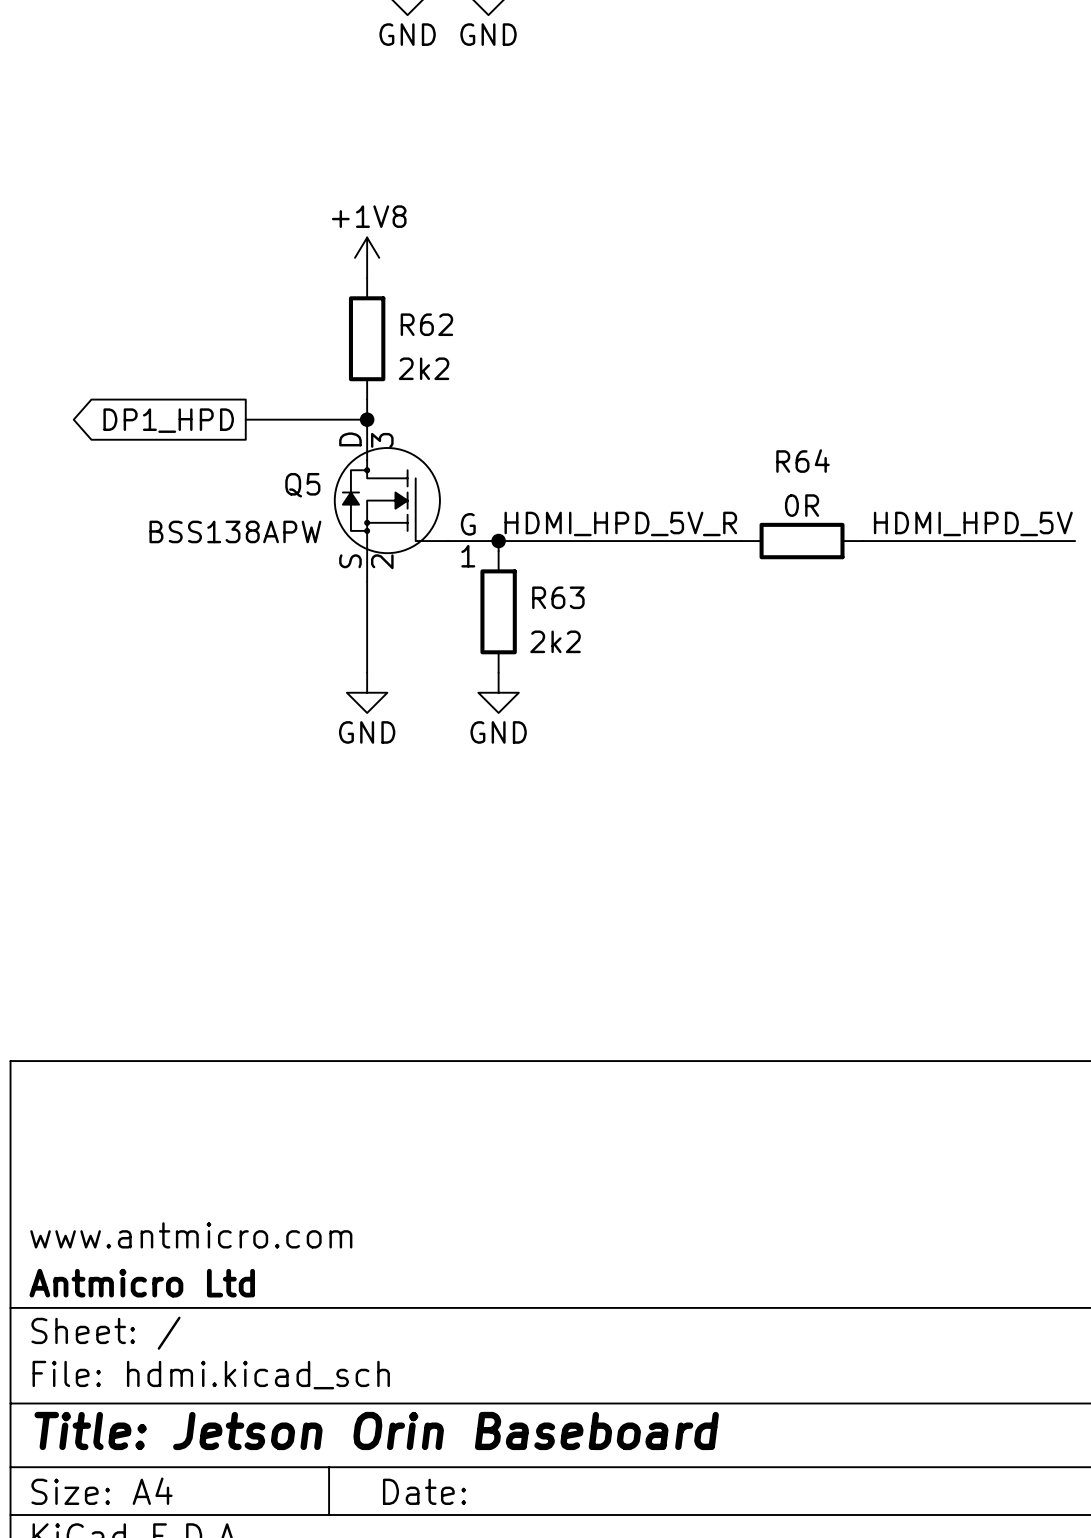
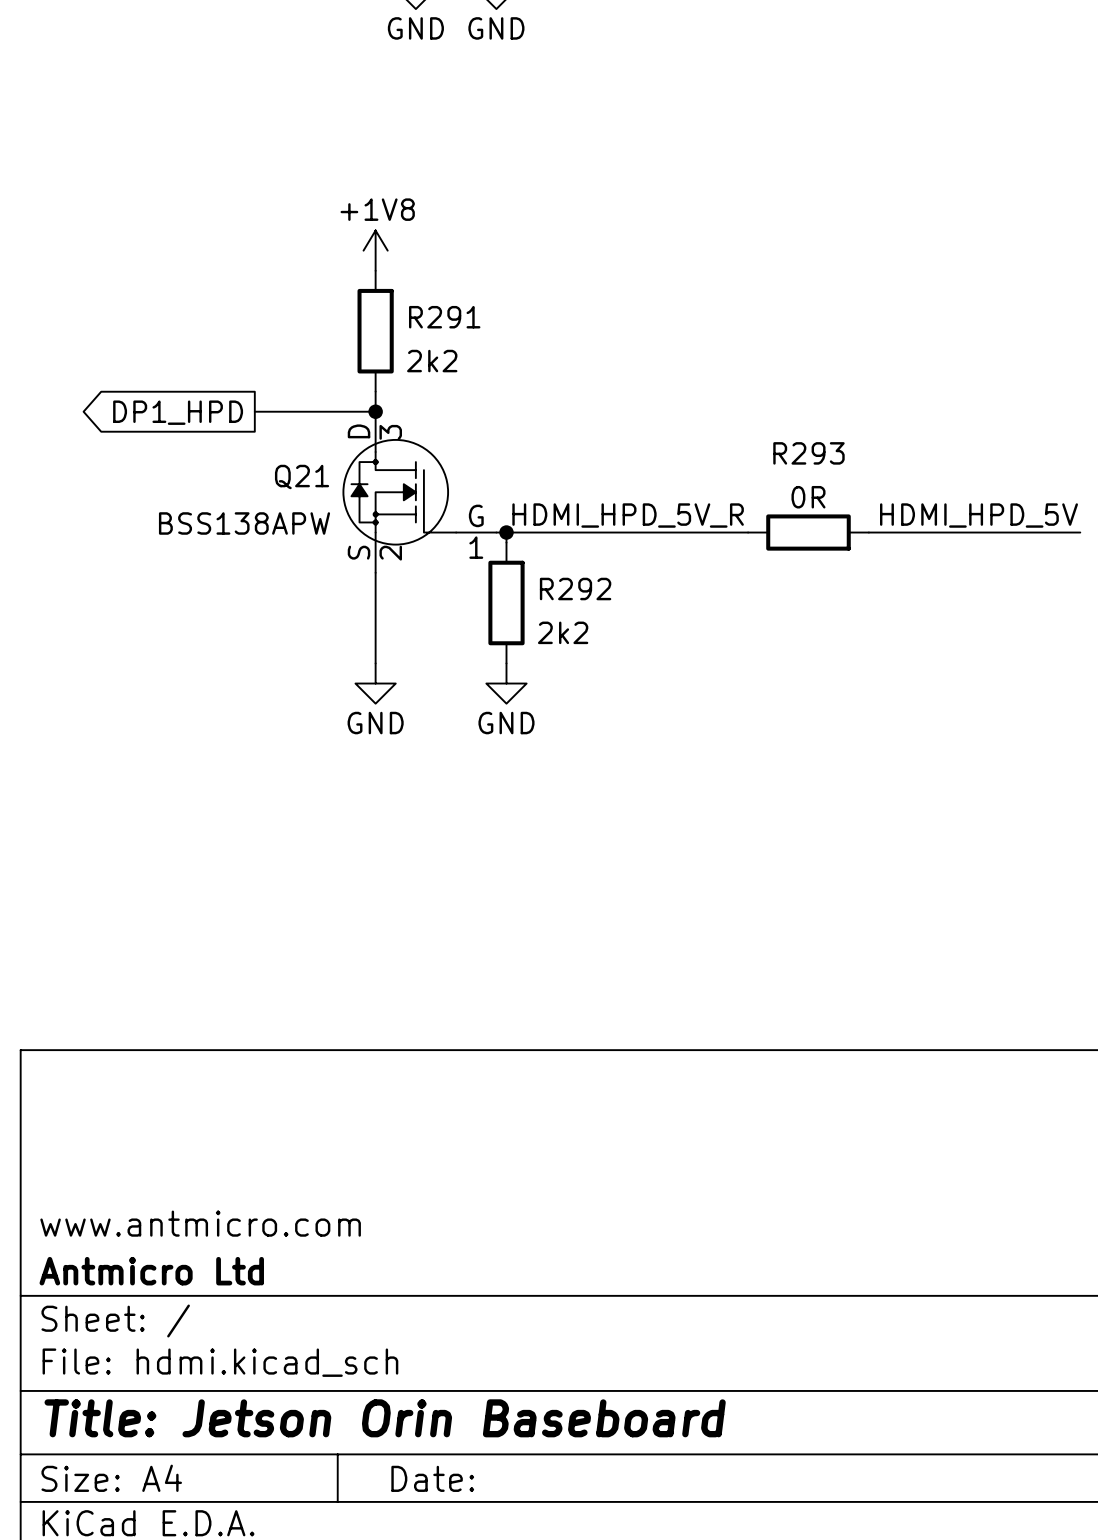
R62 name: R62 (426, 324) -> R291 (444, 317)
R64 name: R64 (803, 461) -> R293 (808, 453)
Q5 name: Q5 (302, 485) -> Q21 (302, 476)
R63 name: R63 (558, 597) -> R292 (575, 589)

